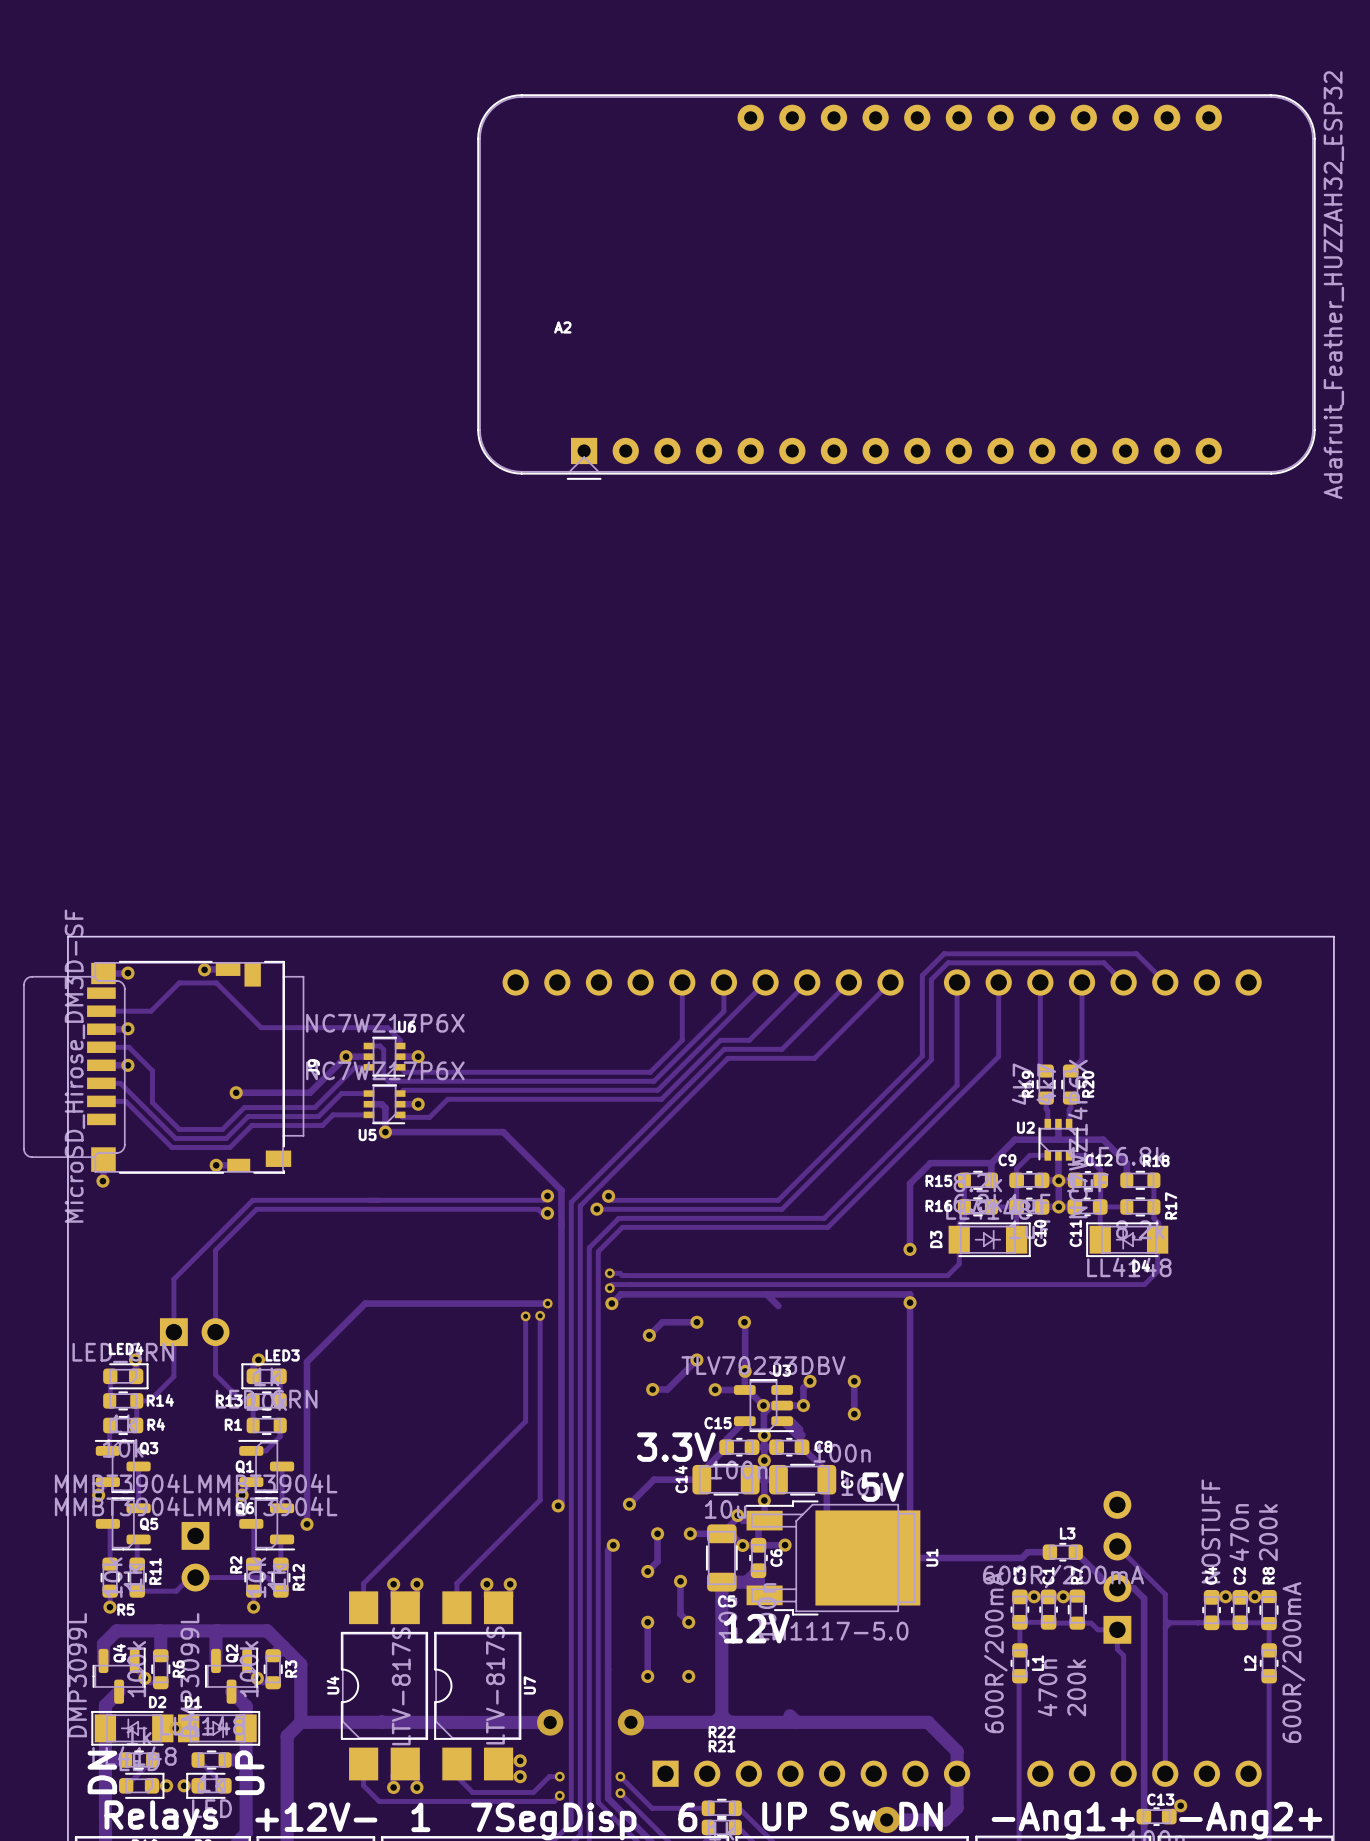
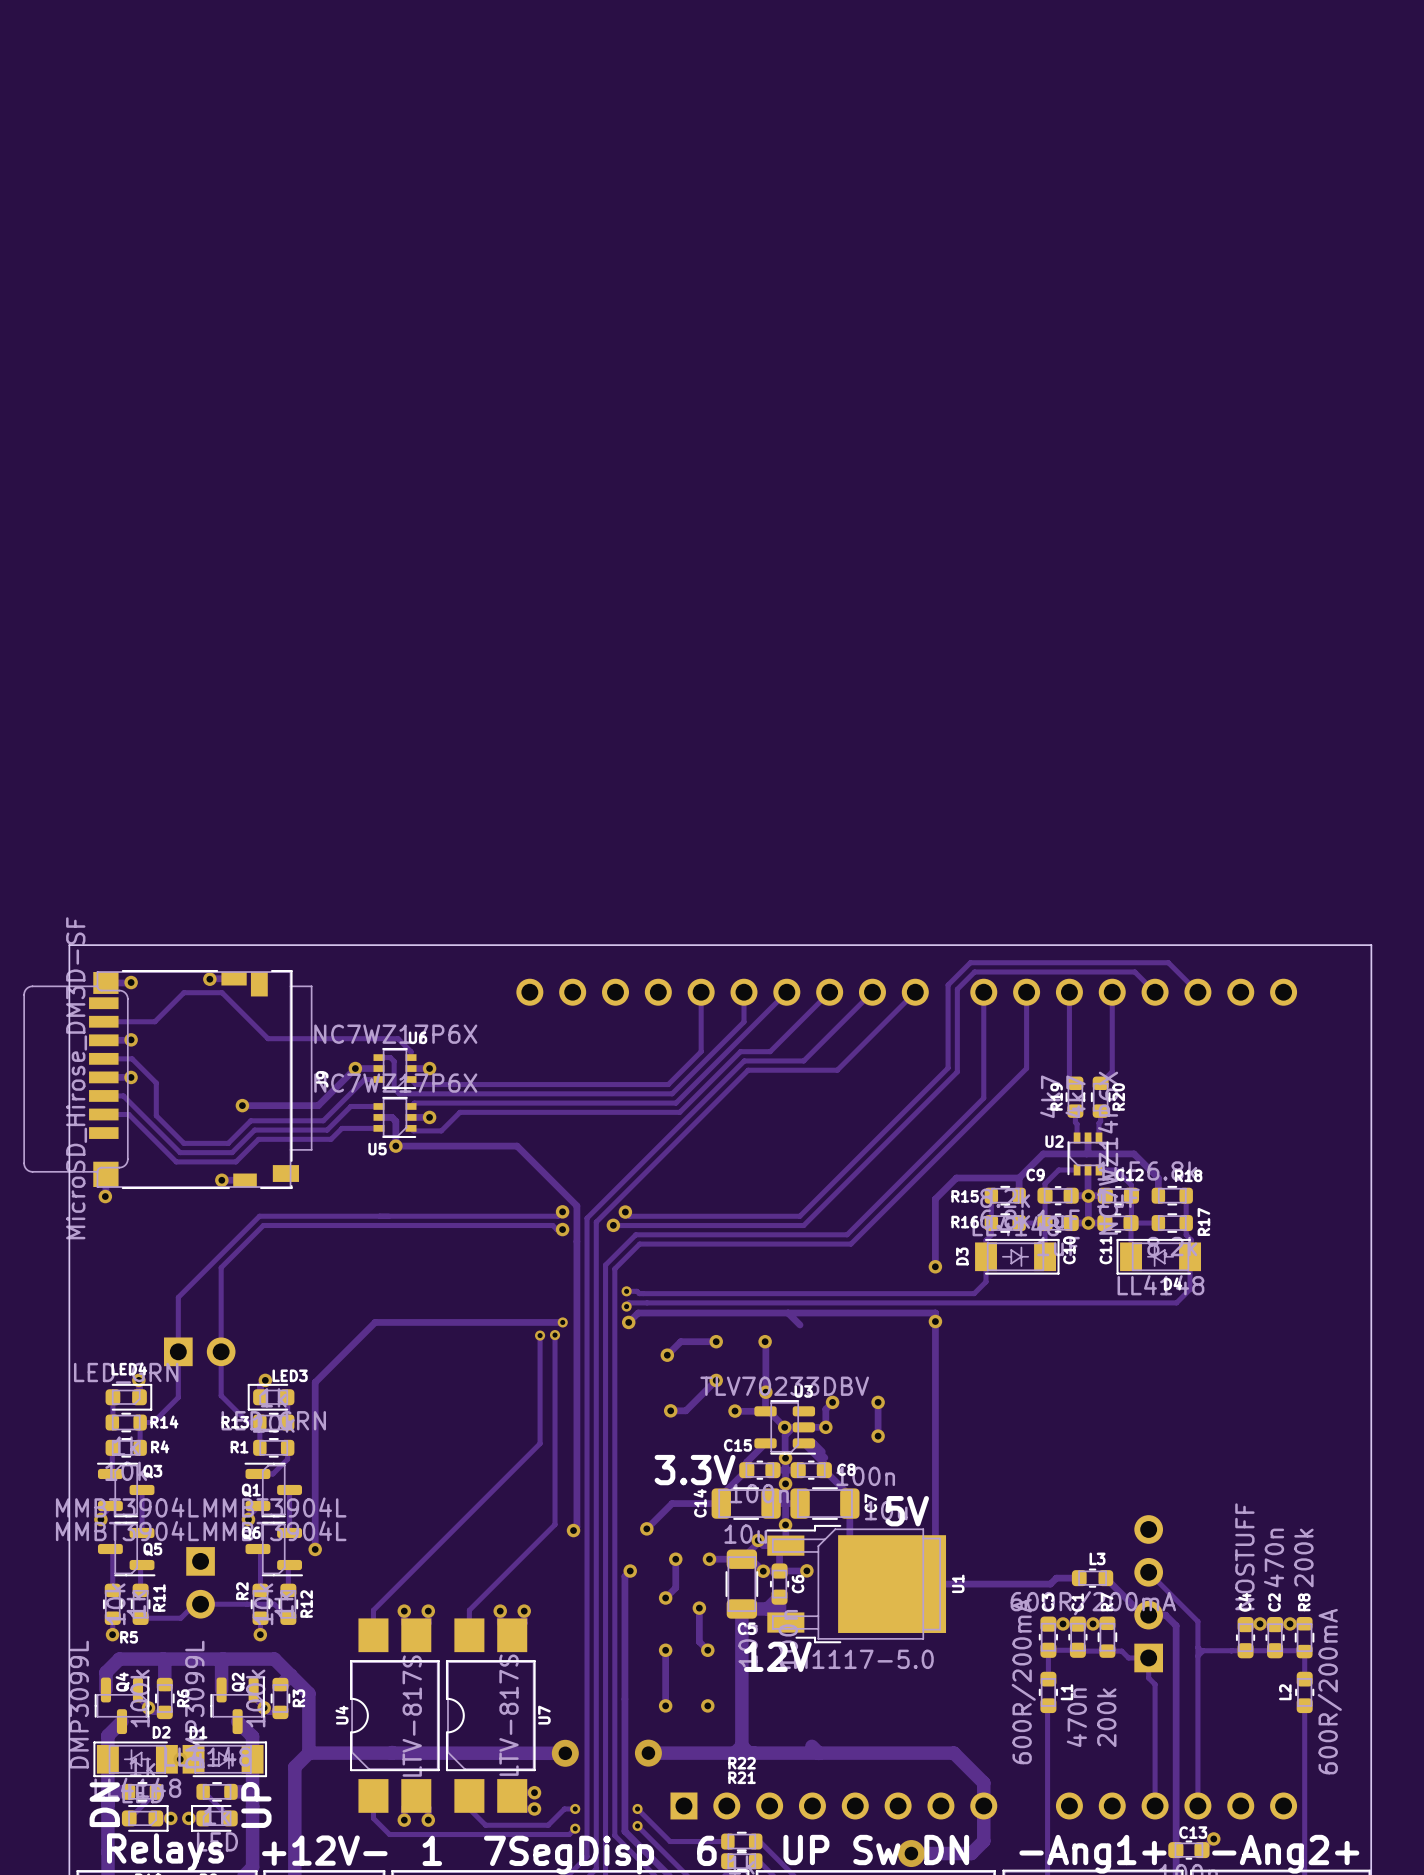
A2: Adafruit_Feather_HUZZAH32_ESP32 (896, 287) -> none

